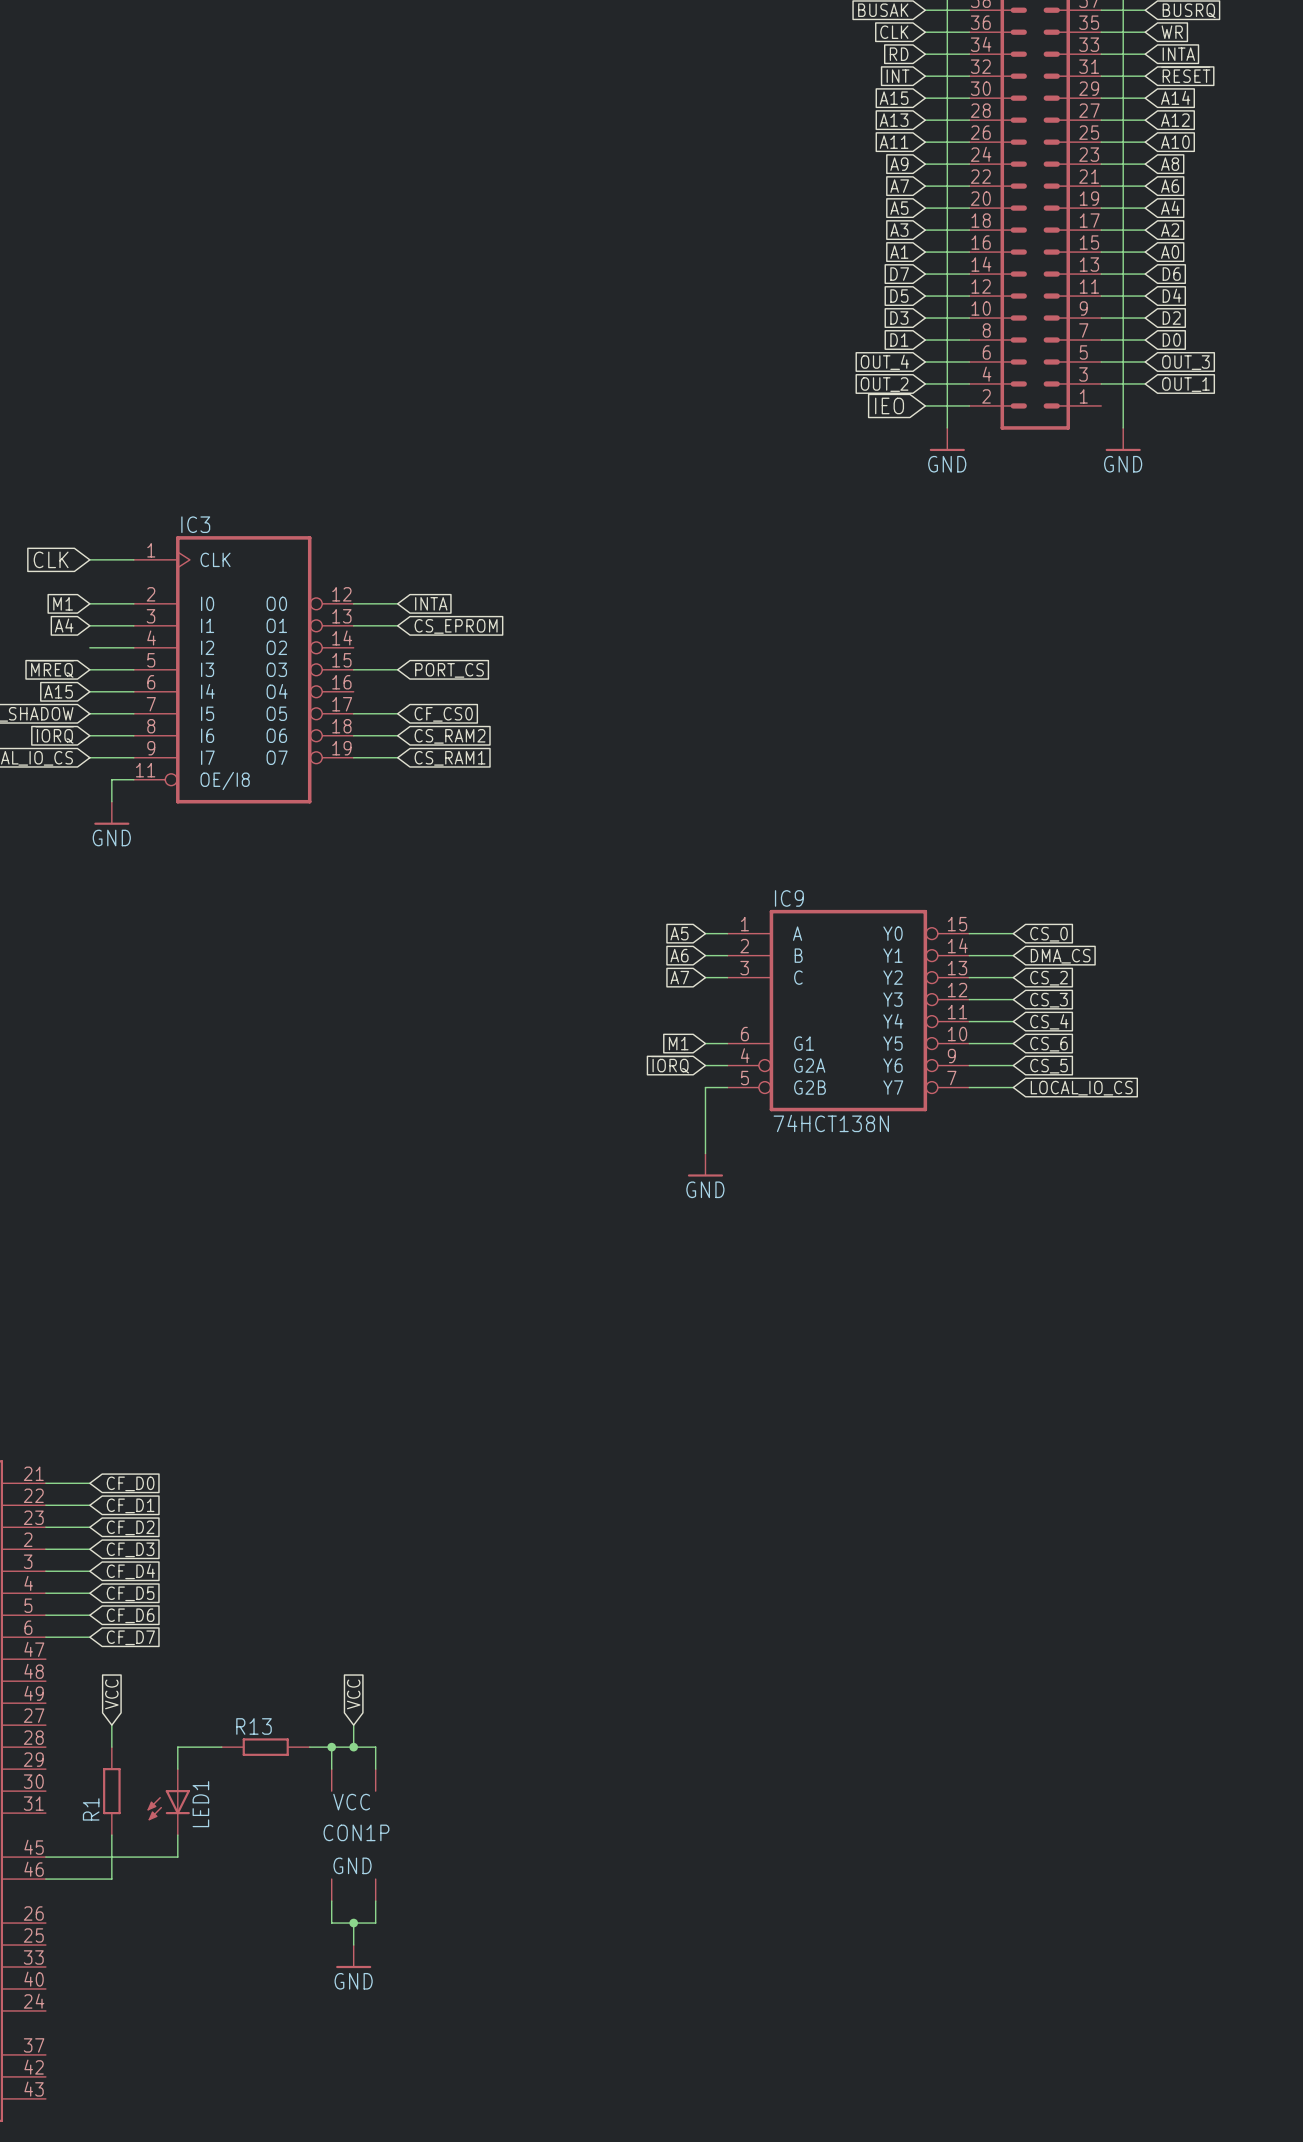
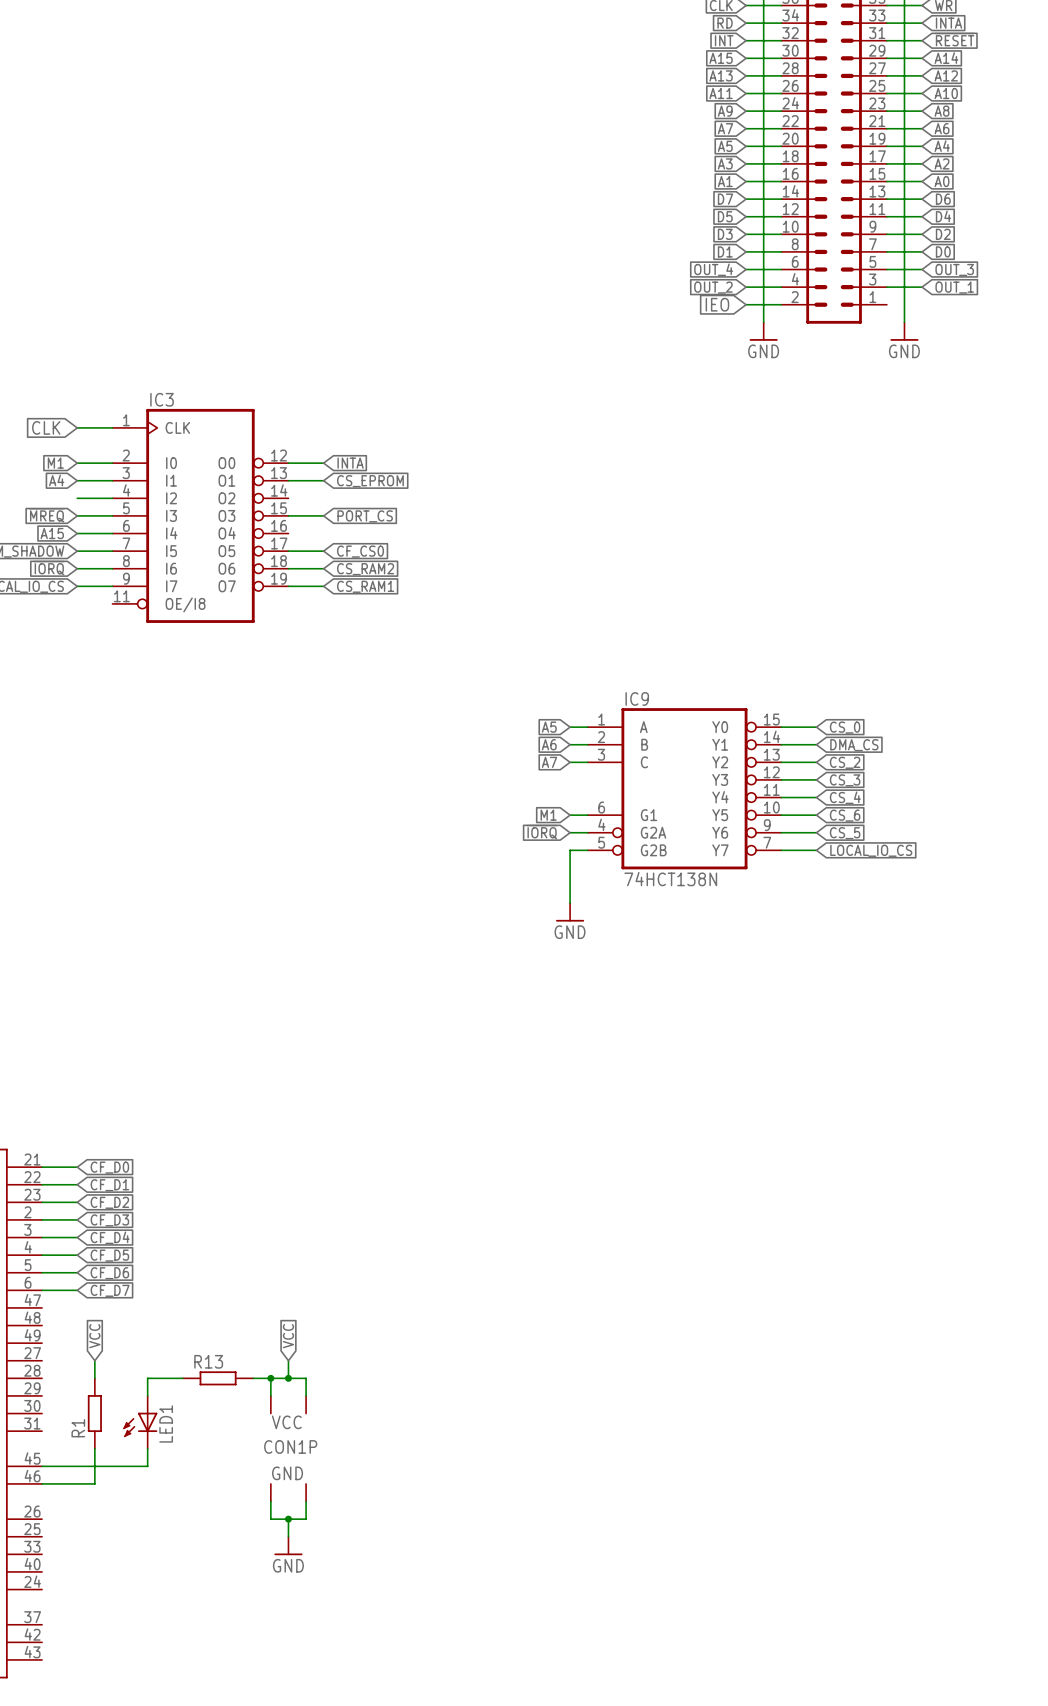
wire: (133, 779) (111, 779) (111, 801) -> none
power symbol: GND (111, 813) -> none

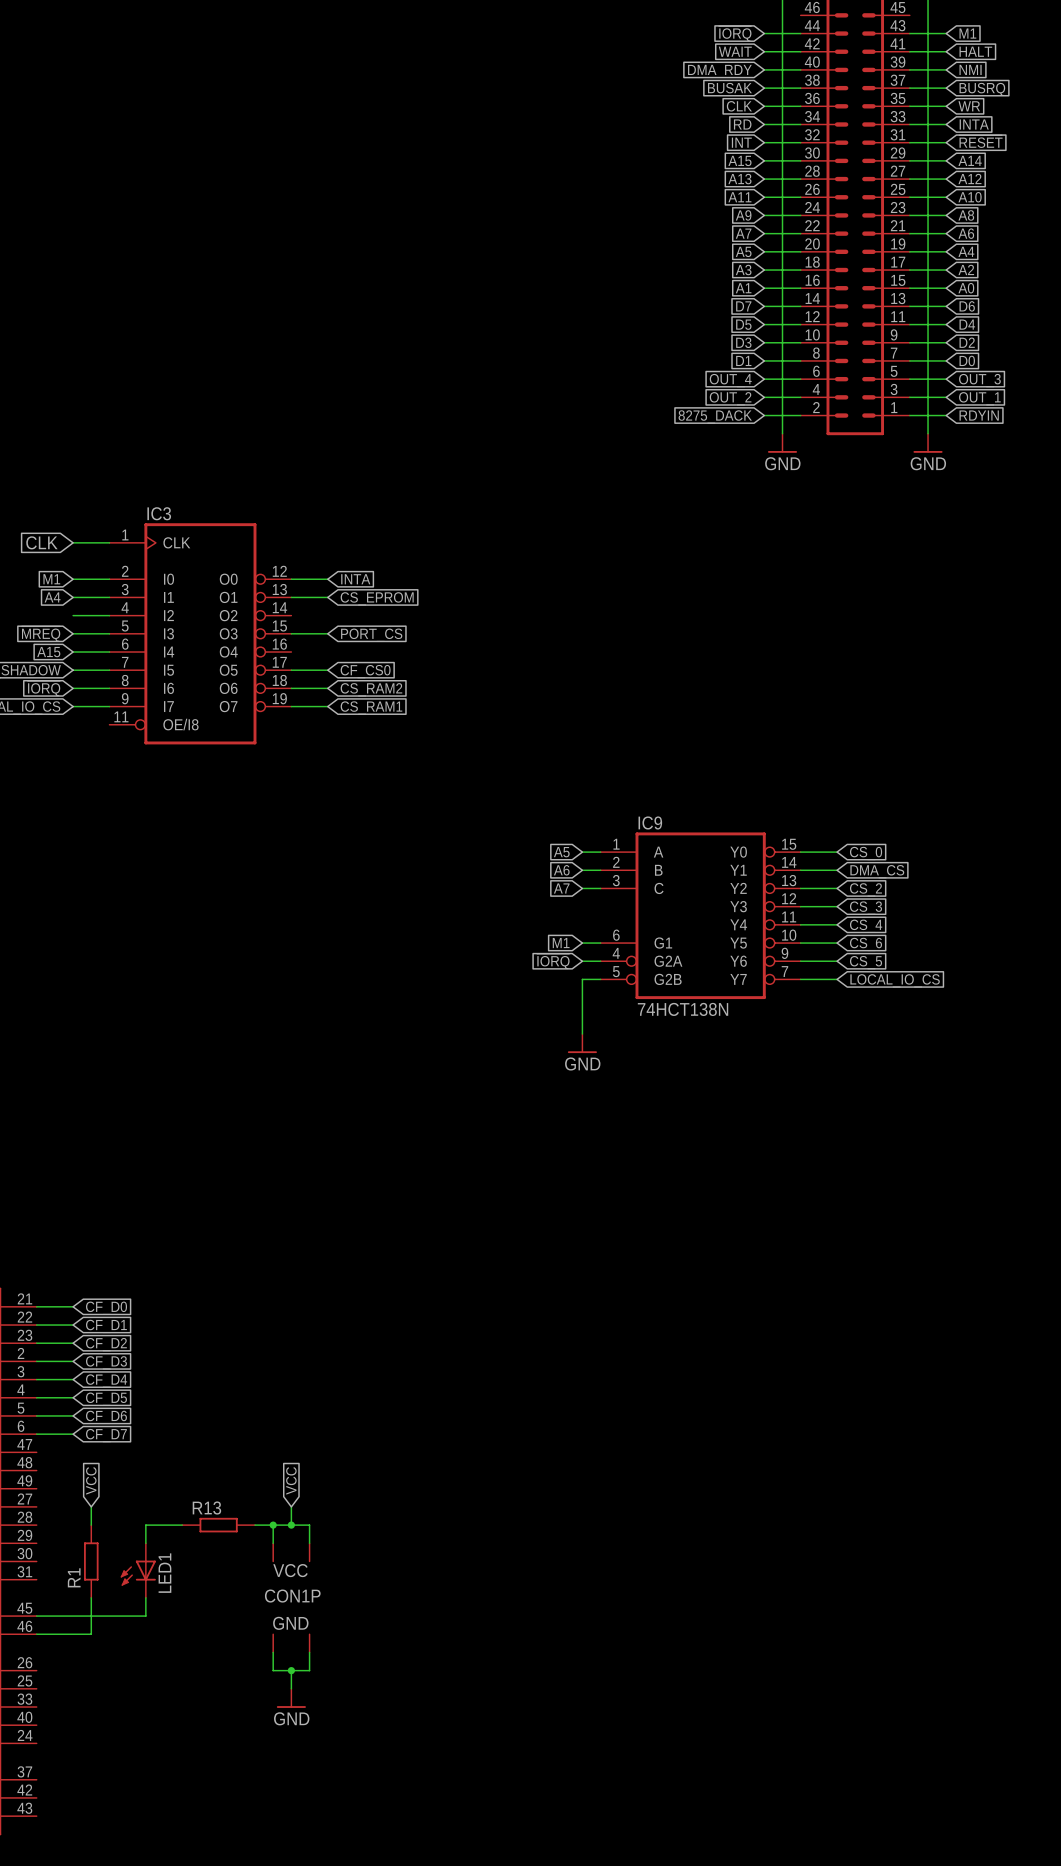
global label: IEO (717, 304) -> 8275_DACK (715, 416)
wire: none -> (909, 415) (946, 415)
global label: none -> RDYIN (979, 415)

